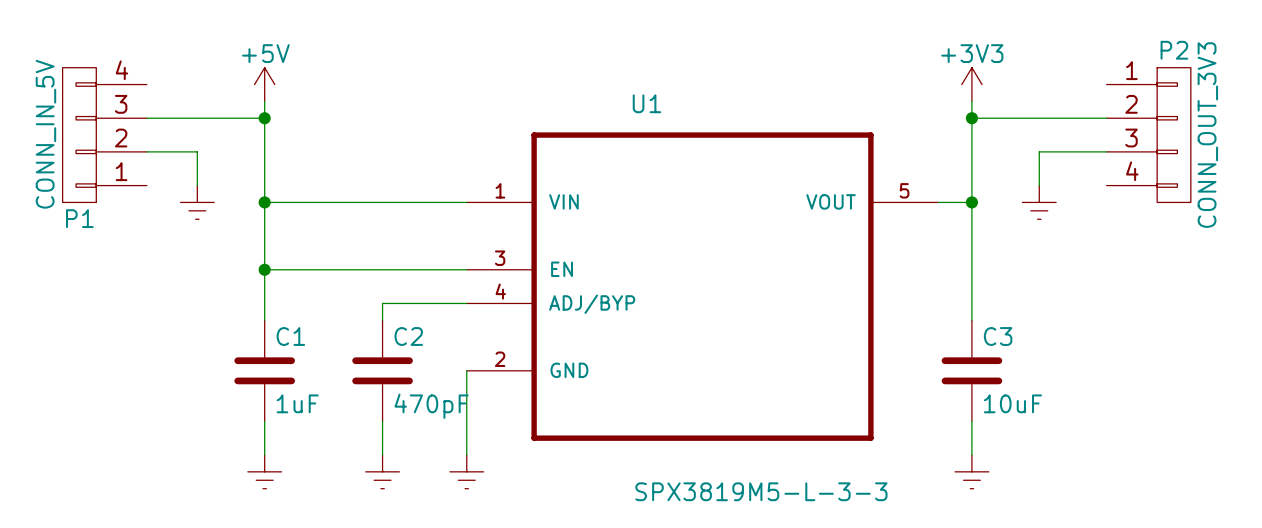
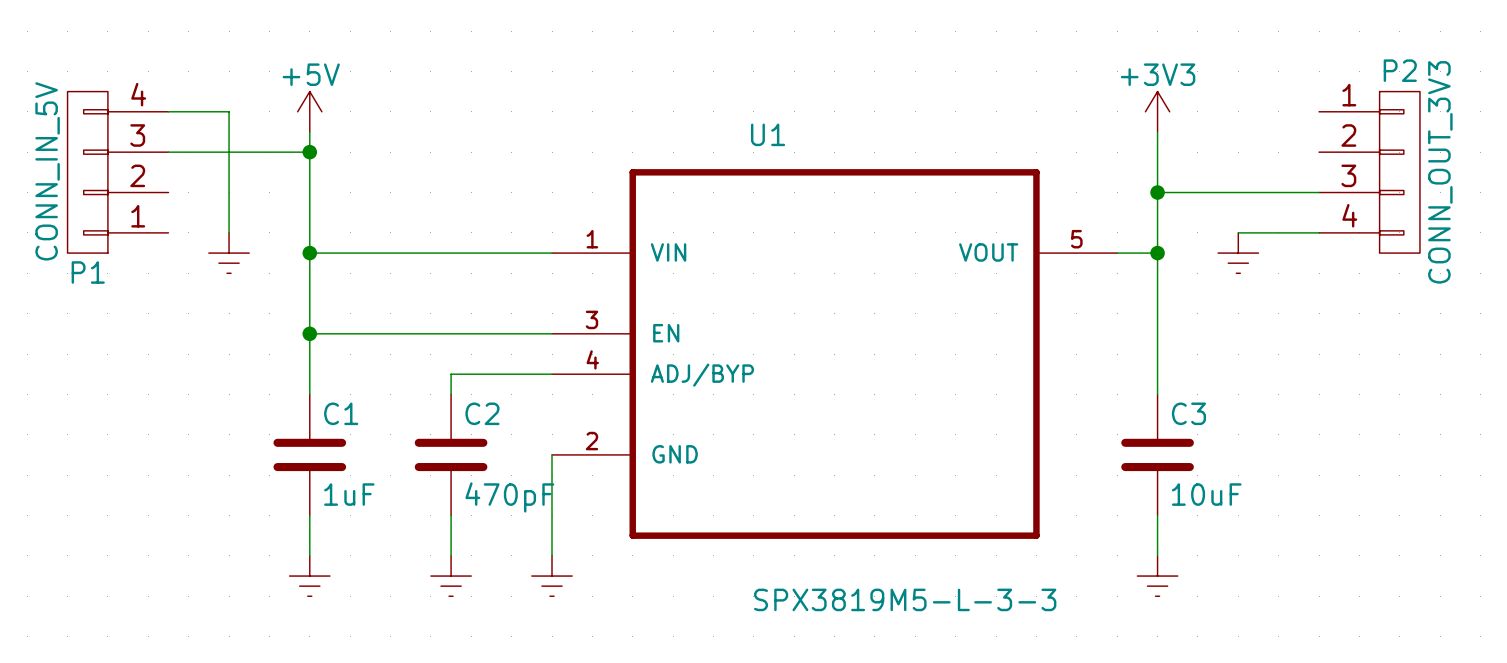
wire: (971, 118) (1106, 118) -> none
junction position: (971, 118) -> (1157, 192)
wire: (146, 151) (197, 151) -> (168, 111) (229, 111) (229, 192)
wire: none -> (1157, 192) (1238, 192)
wire: (1039, 151) (1039, 185) -> (1319, 232) (1238, 232)

